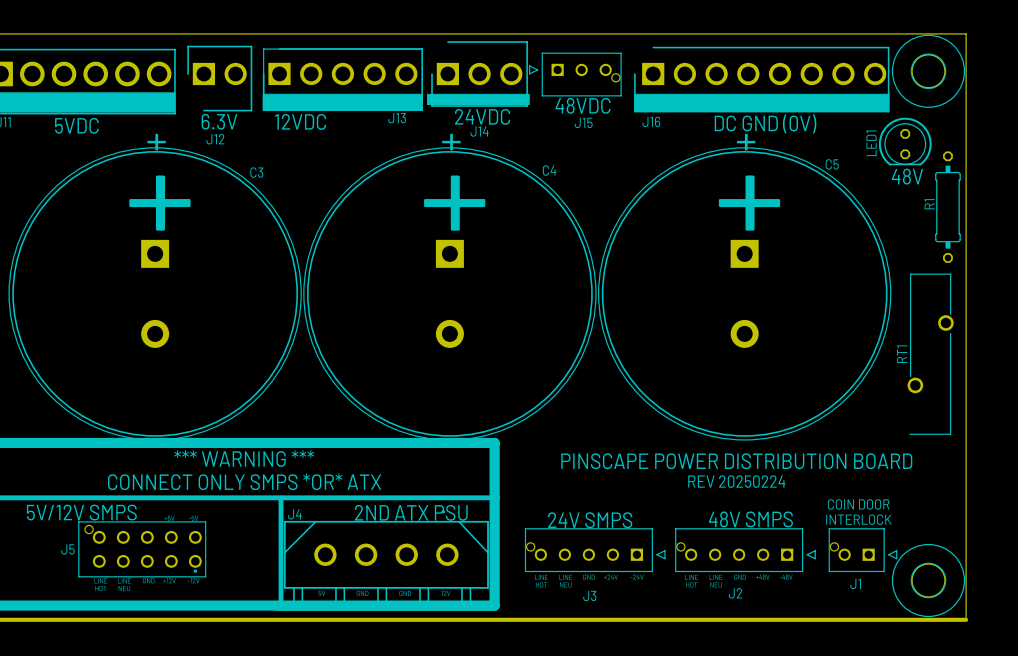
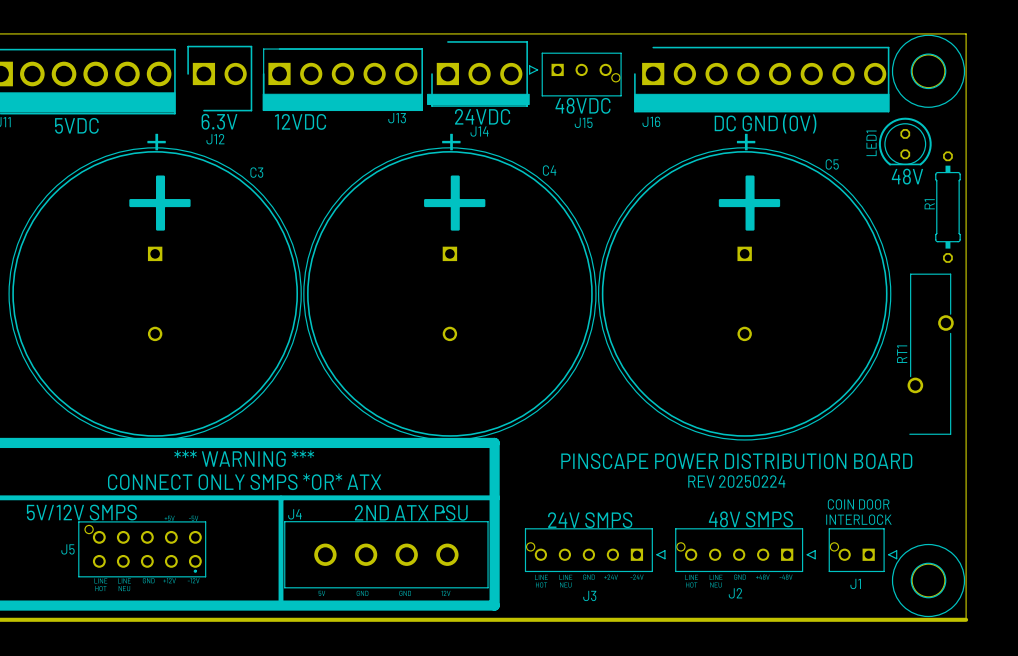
C3 footprint: [8, 147, 302, 441] -> [8, 147, 302, 441]
C4 footprint: [303, 147, 597, 441] -> [303, 147, 597, 441]
C5 footprint: [598, 147, 891, 441] -> [598, 147, 891, 441]
J4 footprint: [276, 510, 497, 611] -> [284, 510, 489, 589]

